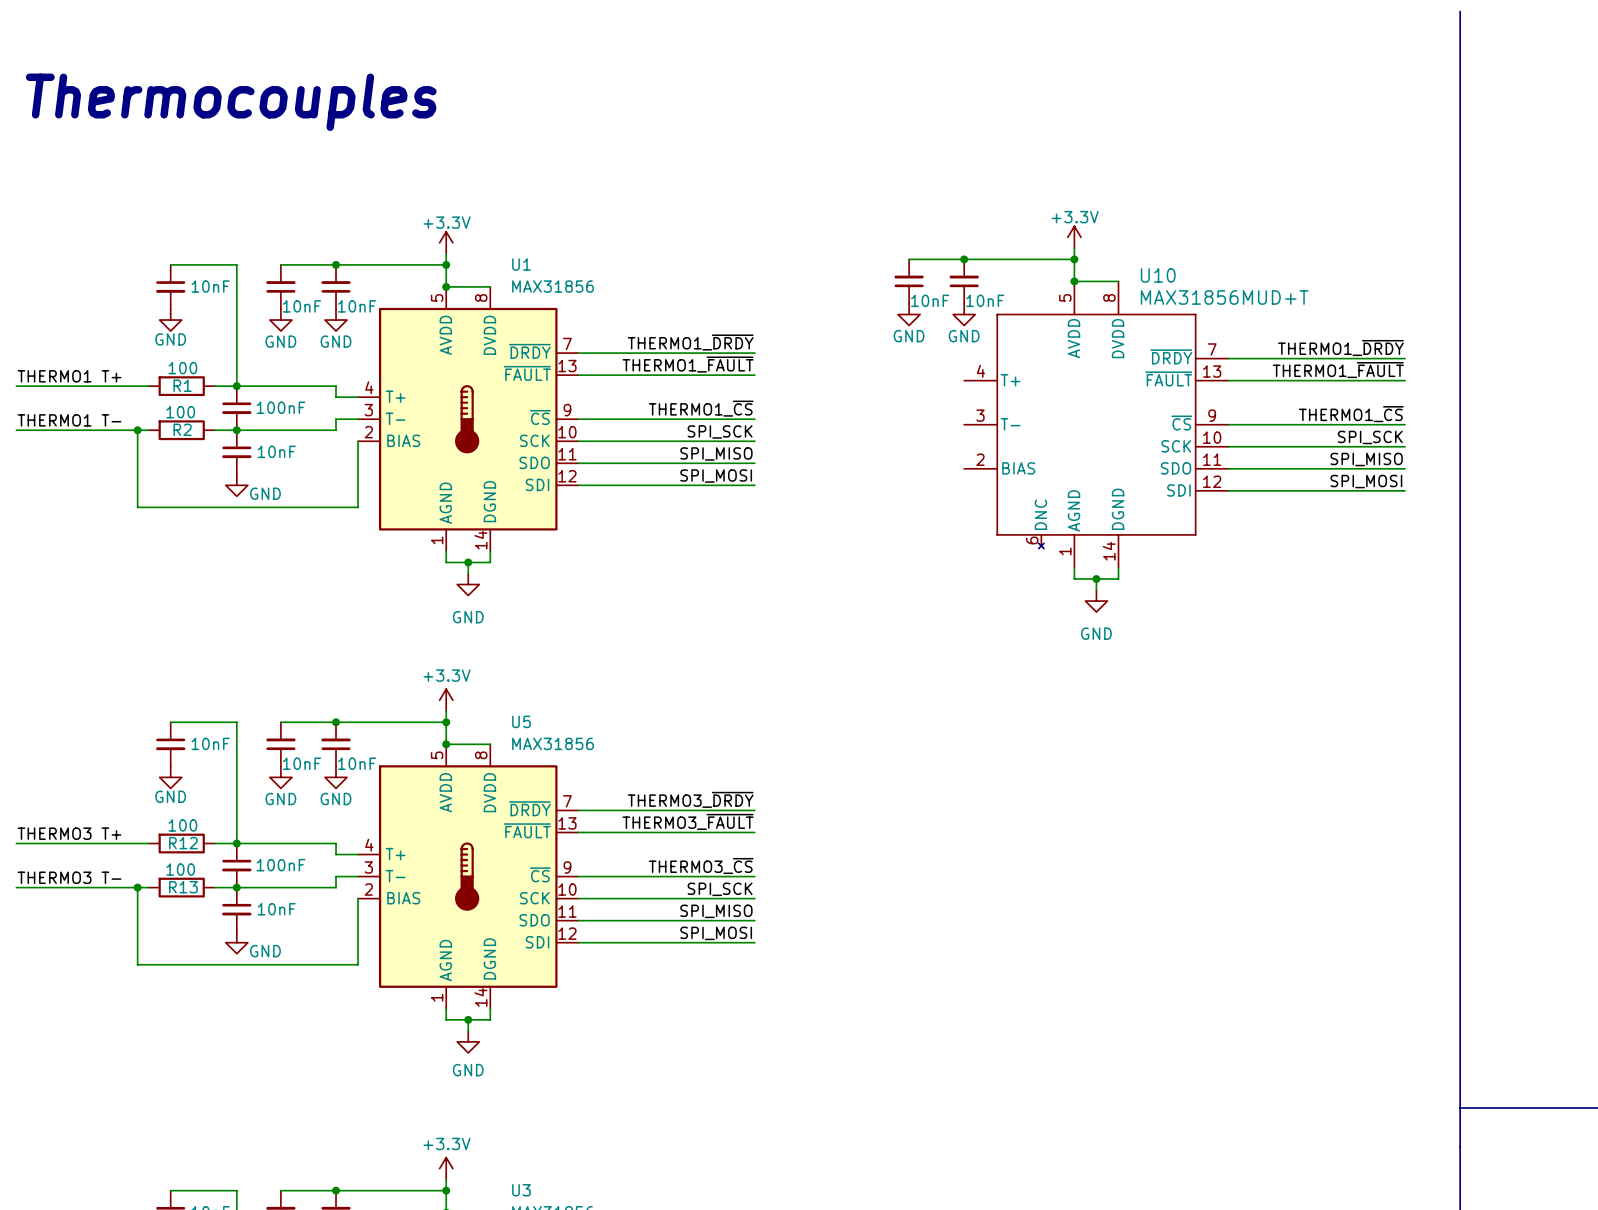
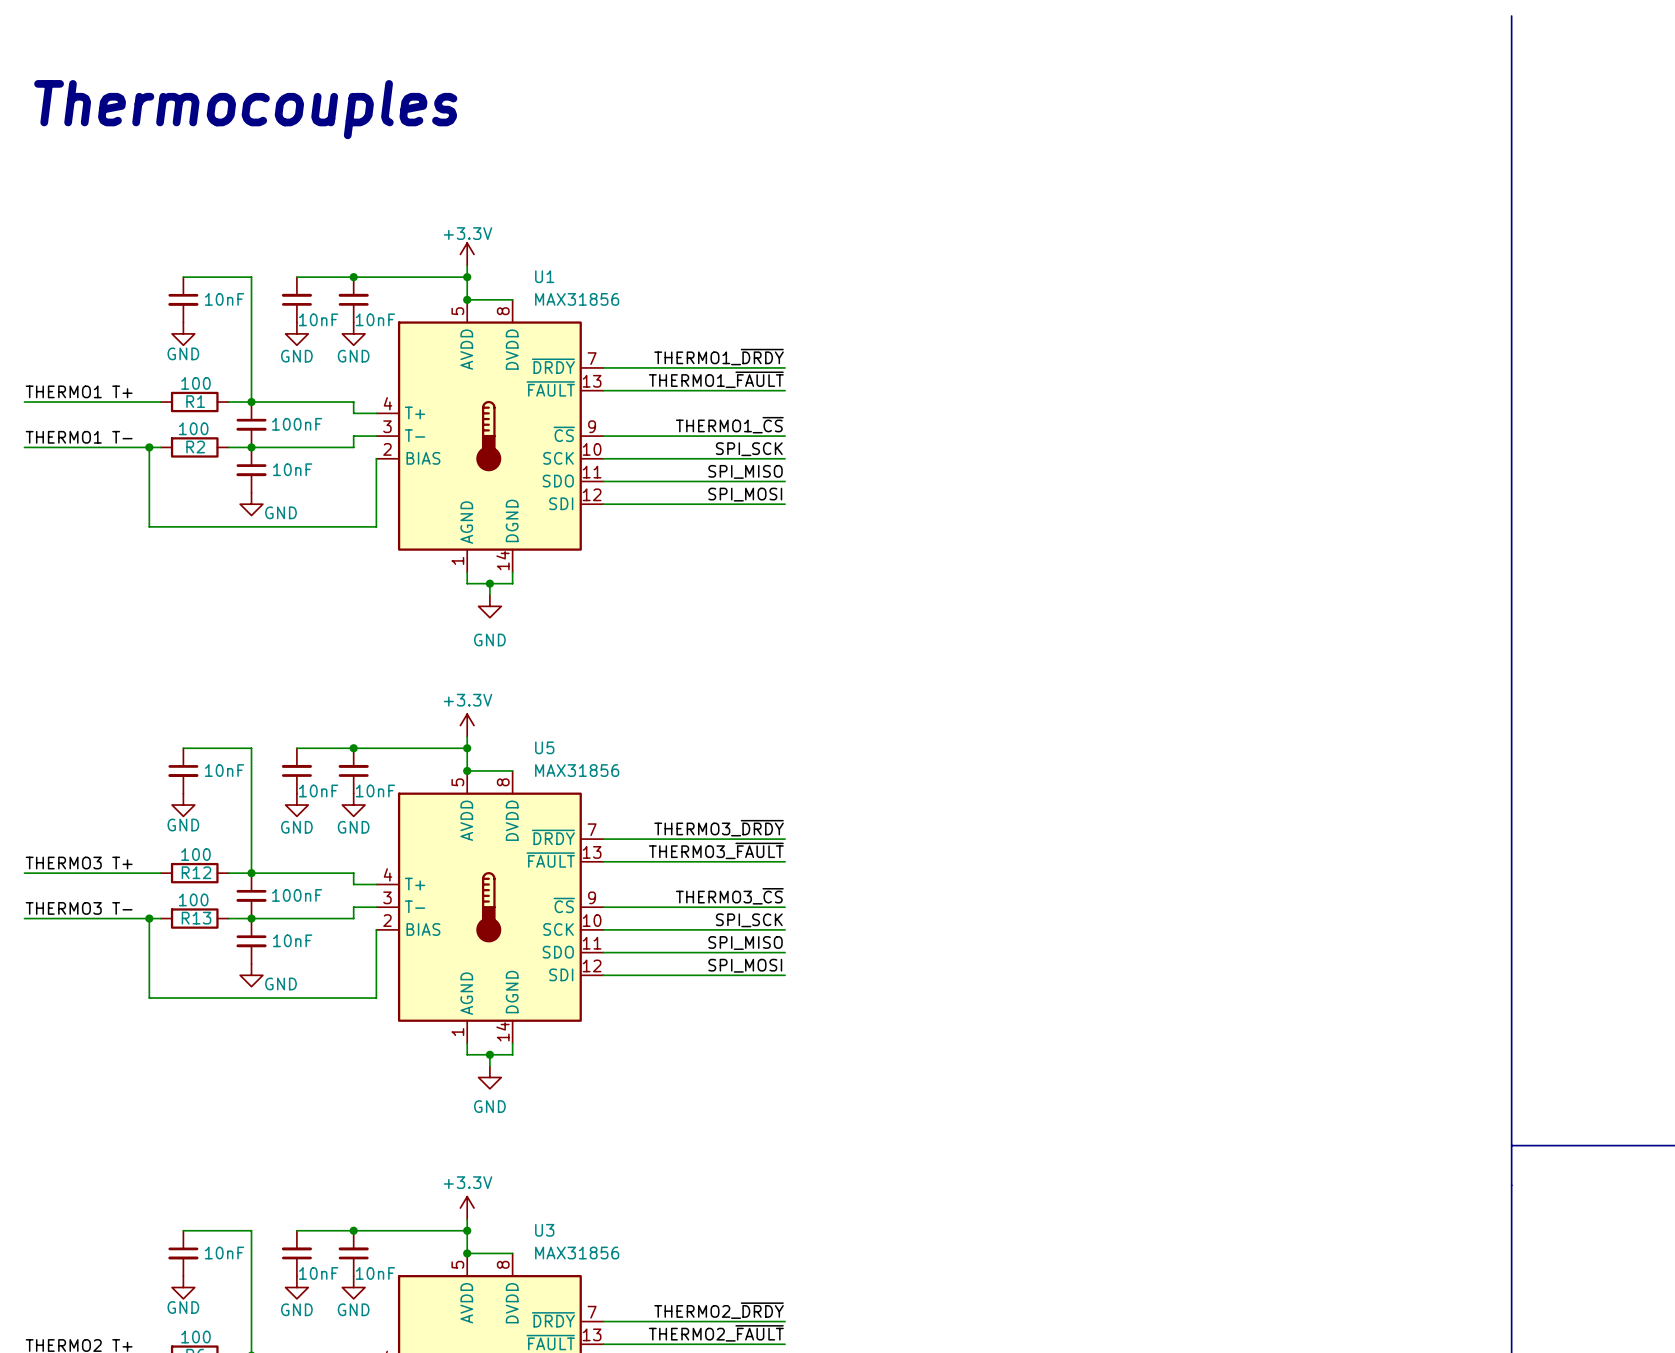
power symbol: +3.3V (1074, 237) -> none
wire: (1074, 248) (1074, 281) (1118, 281) -> none
wire: (909, 259) (1074, 259) -> none
junction: (964, 259) -> none
junction: (1074, 259) -> none
part: 10nF (909, 281) -> none
part: 10nF (964, 281) -> none
junction: (1074, 281) -> none
power symbol: GND (909, 314) -> none
power symbol: GND (964, 314) -> none
label: THERMO1_~{DRDY} (1340, 348) -> none
wire: (1228, 358) (1405, 358) -> none
label: THERMO1_~{FAULT} (1338, 370) -> none
wire: (1228, 380) (1405, 380) -> none
label: THERMO1_~{CS} (1351, 414) -> none
U10: MAX31856MUD+T (1096, 424) -> none
wire: (1228, 424) (1405, 424) -> none
label: SPI_SCK (1370, 437) -> none
wire: (1228, 446) (1405, 446) -> none
label: SPI_MISO (1366, 459) -> none
wire: (1228, 468) (1405, 468) -> none
label: SPI_MOSI (1366, 481) -> none
wire: (1228, 490) (1405, 490) -> none
wire: (1074, 567) (1074, 579) (1118, 579) (1118, 567) -> none
wire: (1096, 579) (1096, 590) -> none
junction: (1096, 579) -> none
power symbol: GND (1096, 601) -> none

